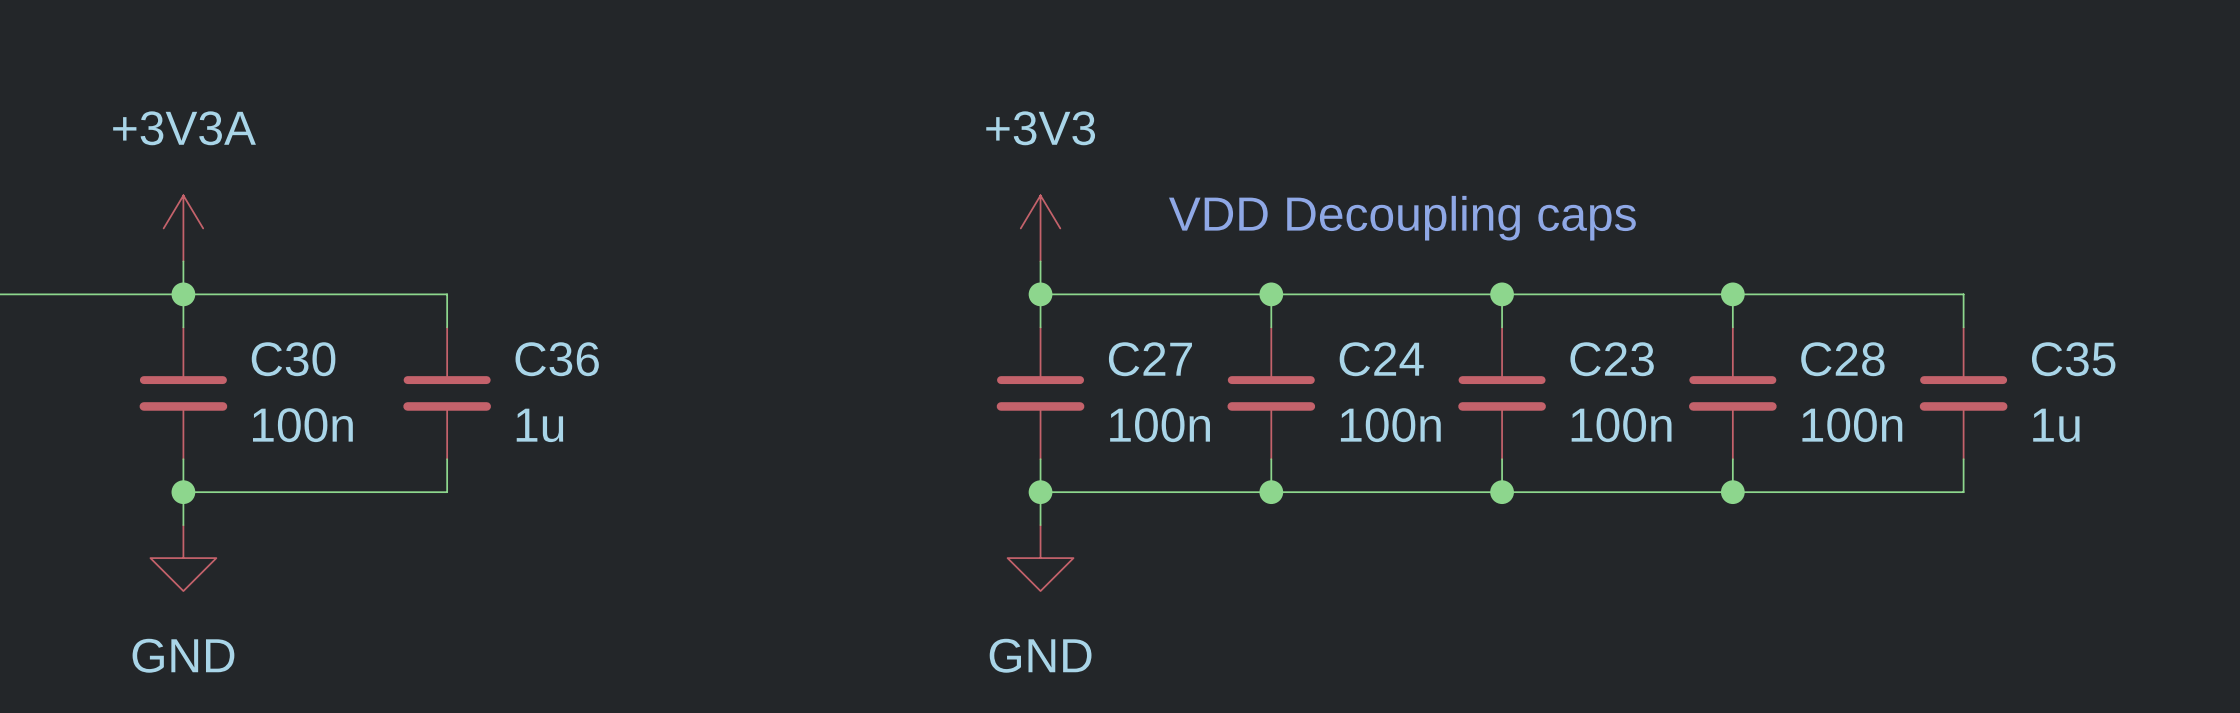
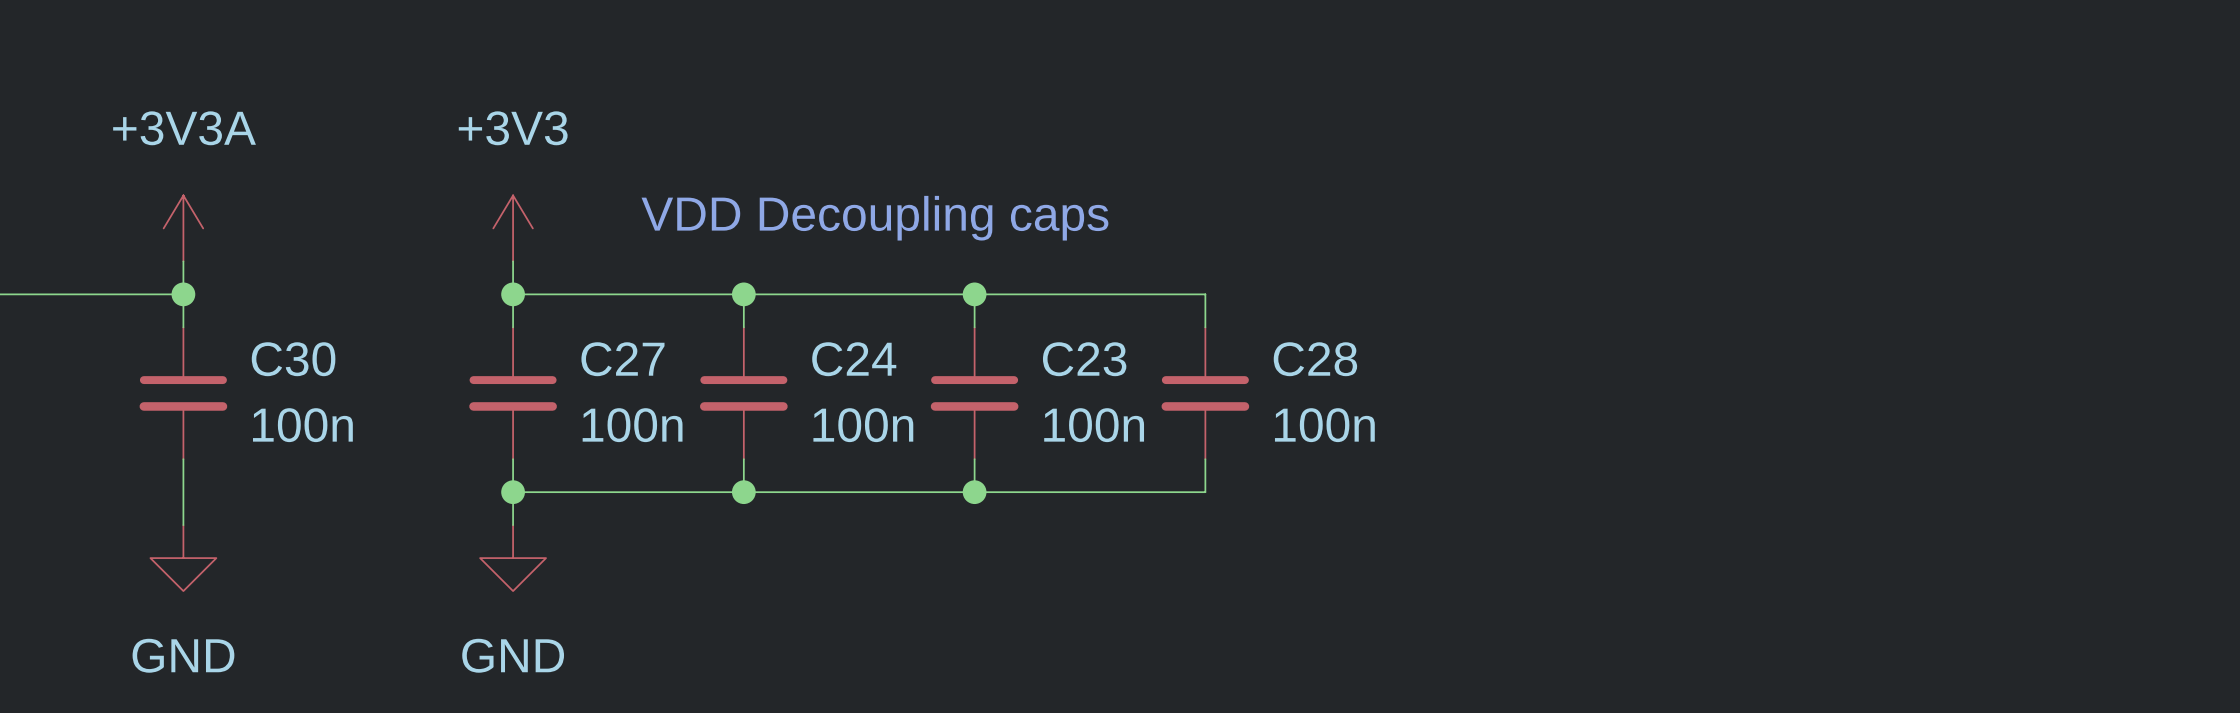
text position: VDD Decoupling caps (1402, 218) -> VDD Decoupling caps (874, 218)
power symbol position: +3V3 (1040, 228) -> +3V3 (513, 228)
wire: (1040, 261) (1040, 327) -> (513, 261) (513, 327)
wire: (183, 294) (447, 294) (447, 327) -> none
wire: none -> (513, 294) (1040, 294)
junction: none -> (513, 294)
junction: none -> (743, 294)
junction position: (1040, 294) -> (974, 294)
wire: (1205, 294) (1963, 294) (1963, 327) -> (1205, 294) (1205, 327)
wire: (1271, 294) (1271, 327) -> (743, 294) (743, 327)
junction: (1271, 294) -> none
wire: (1502, 294) (1502, 327) -> (974, 294) (974, 327)
junction: (1502, 294) -> none
wire: (1732, 294) (1732, 327) -> none
junction: (1732, 294) -> none
C36: 1u (447, 393) -> none
C27 position: (1040, 393) -> (513, 393)
C24 position: (1271, 393) -> (743, 393)
C23 position: (1502, 393) -> (974, 393)
C28 position: (1732, 393) -> (1205, 393)
C35: 1u (1963, 393) -> none
wire: (447, 459) (447, 492) (183, 492) -> none
wire: (1040, 459) (1040, 525) -> (513, 459) (513, 525)
wire: (1271, 459) (1271, 492) -> (743, 459) (743, 492)
wire: (1502, 459) (1502, 492) -> (974, 459) (974, 492)
wire: (1732, 459) (1732, 492) -> none
wire: (1963, 459) (1963, 492) (1205, 492) -> (1205, 459) (1205, 492)
junction: (183, 492) -> none
wire: none -> (513, 492) (1040, 492)
junction: none -> (513, 492)
junction: none -> (743, 492)
junction position: (1040, 492) -> (974, 492)
junction: (1271, 492) -> none
junction: (1502, 492) -> none
junction: (1732, 492) -> none
power symbol position: GND (1040, 558) -> GND (513, 558)

